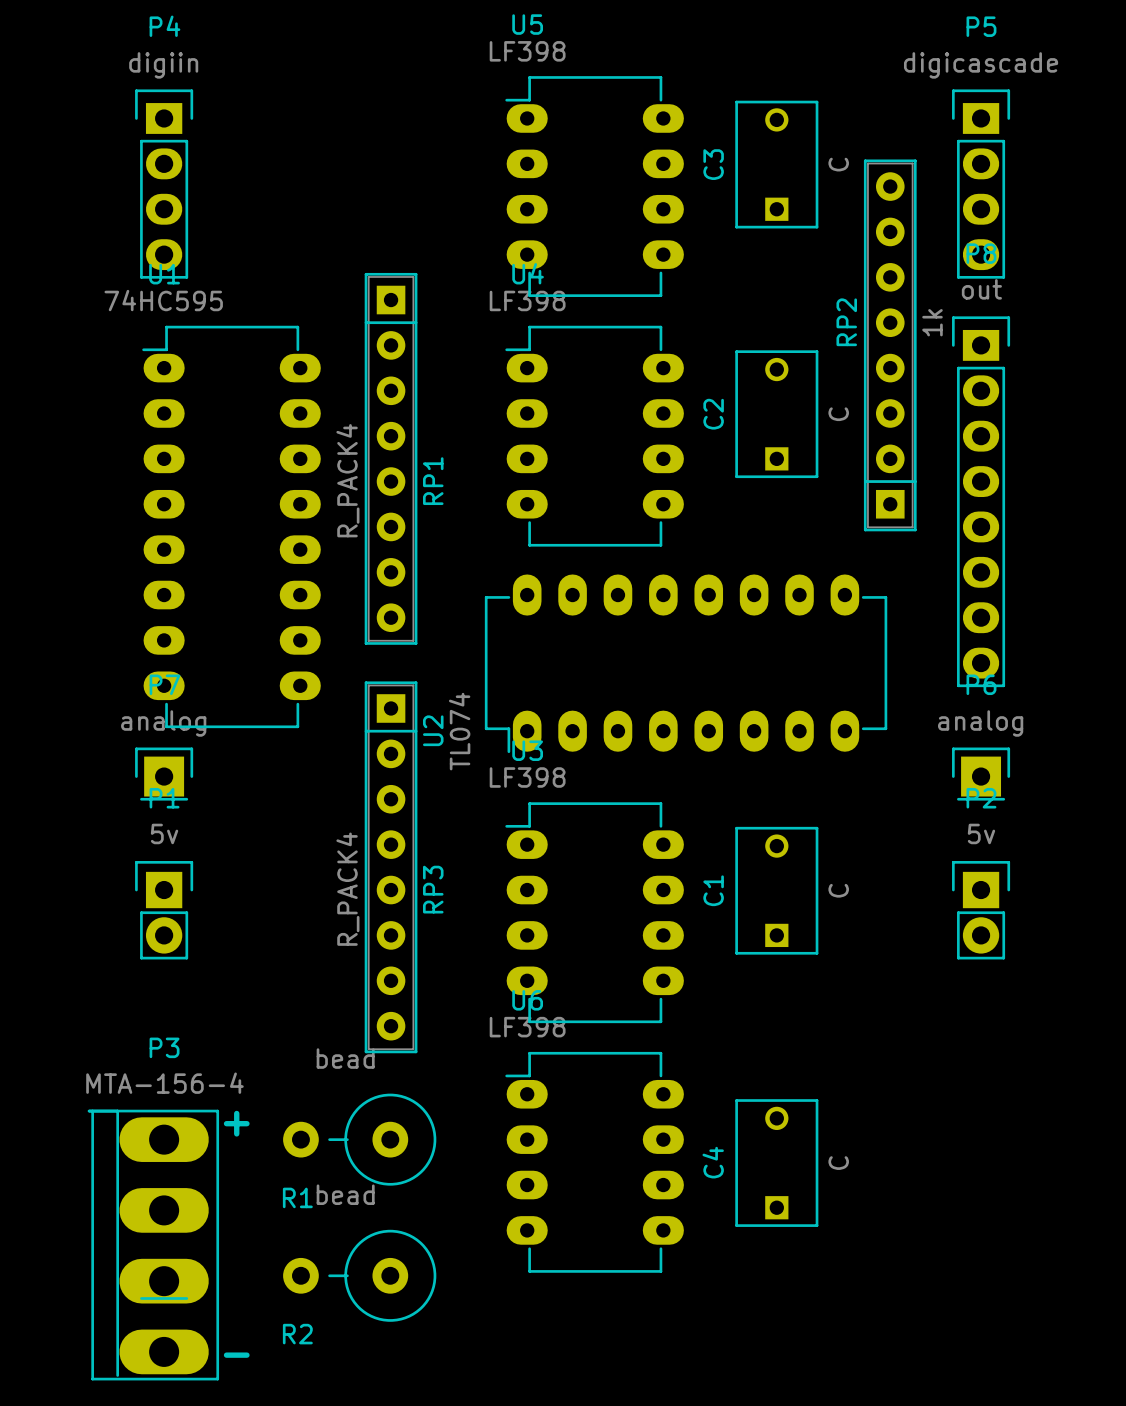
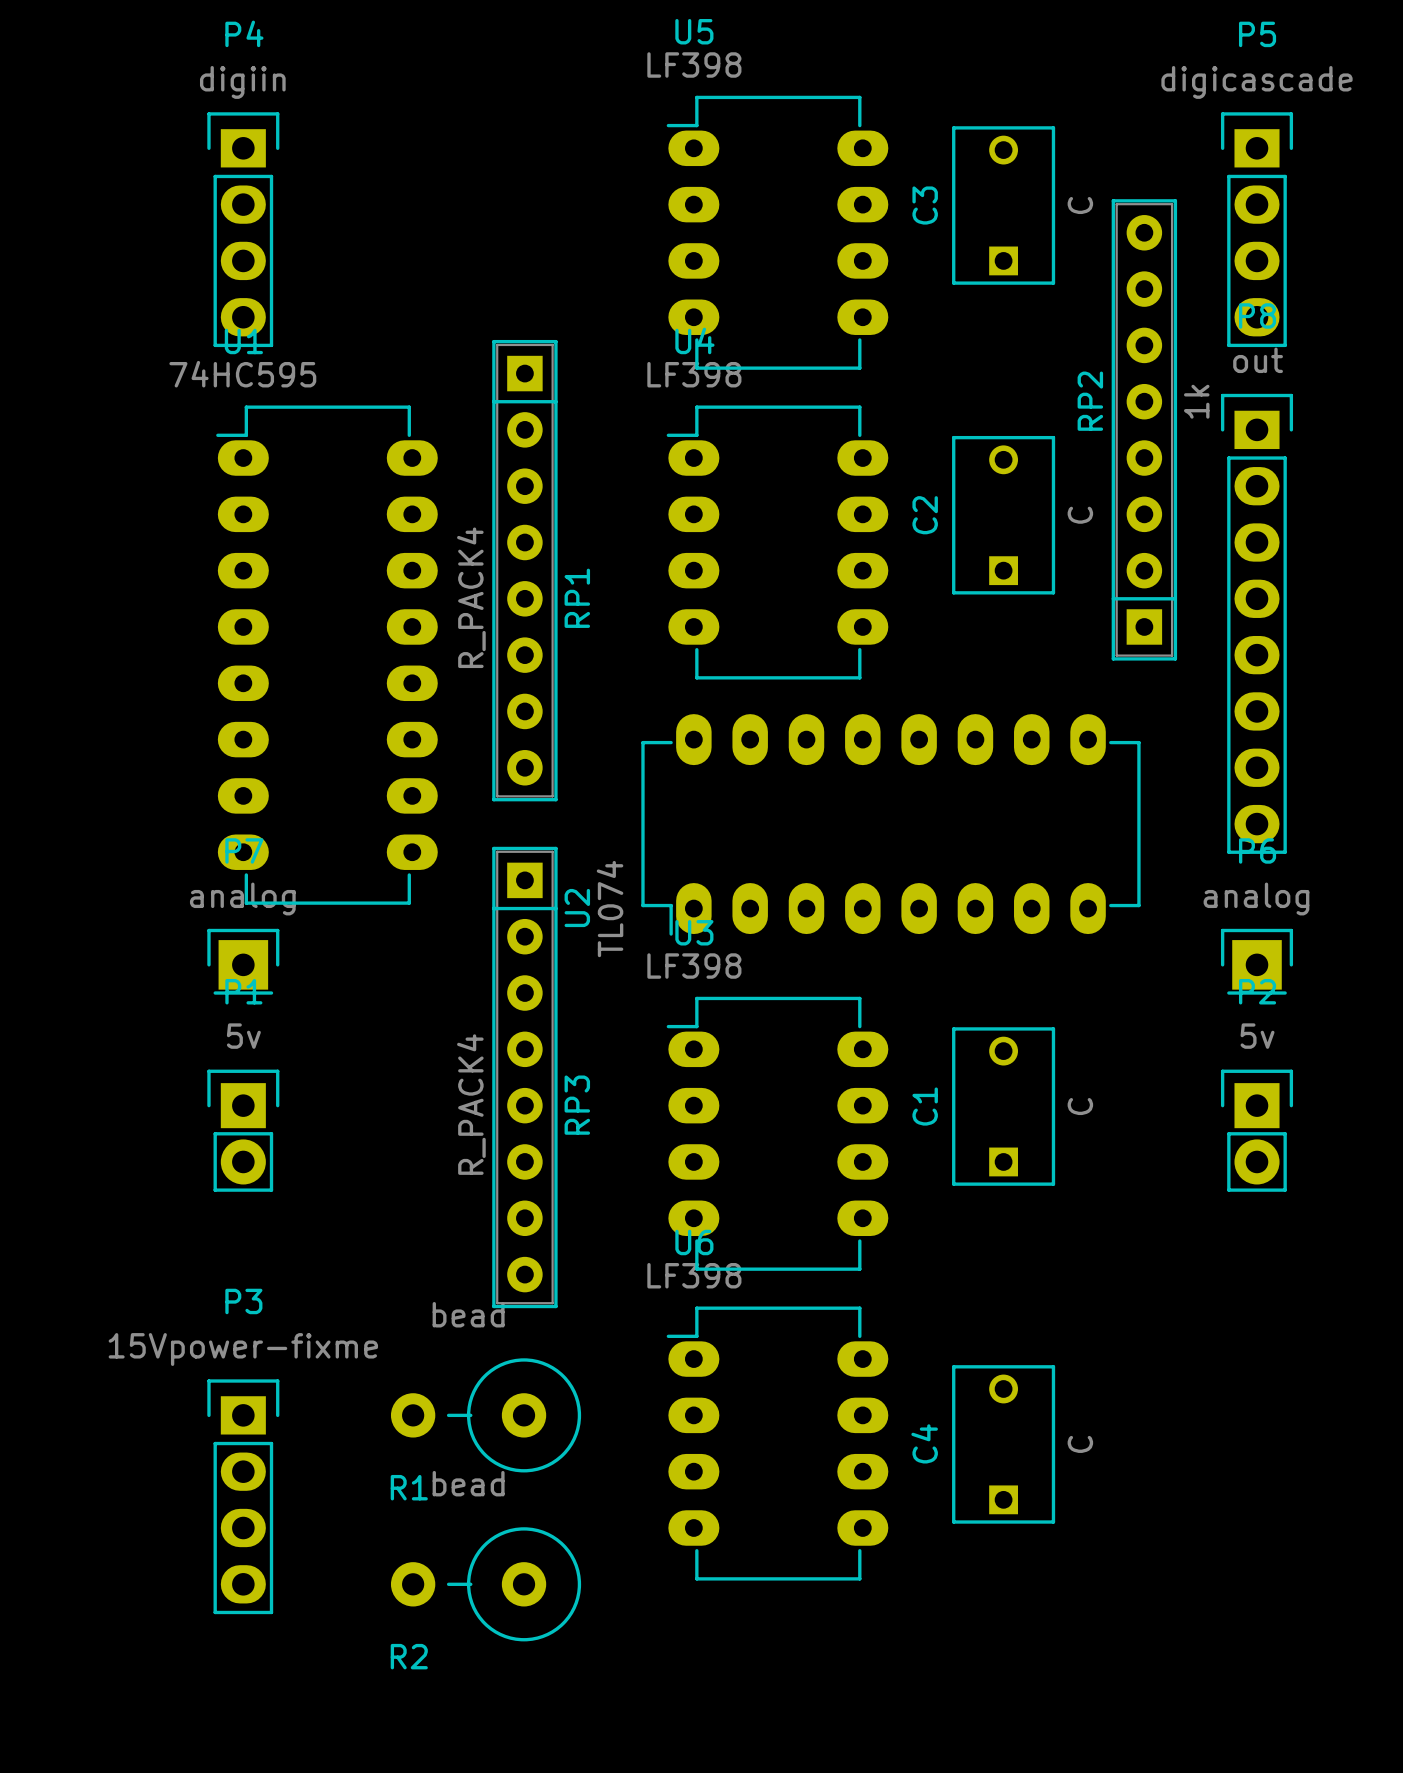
P3 value: MTA-156-4 (164, 1083) -> 15Vpower-fixme (243, 1349)
P3 footprint: [87, 1109, 220, 1381] -> [207, 1379, 280, 1615]
text: + (236, 1123) -> none
text: - (236, 1355) -> none

